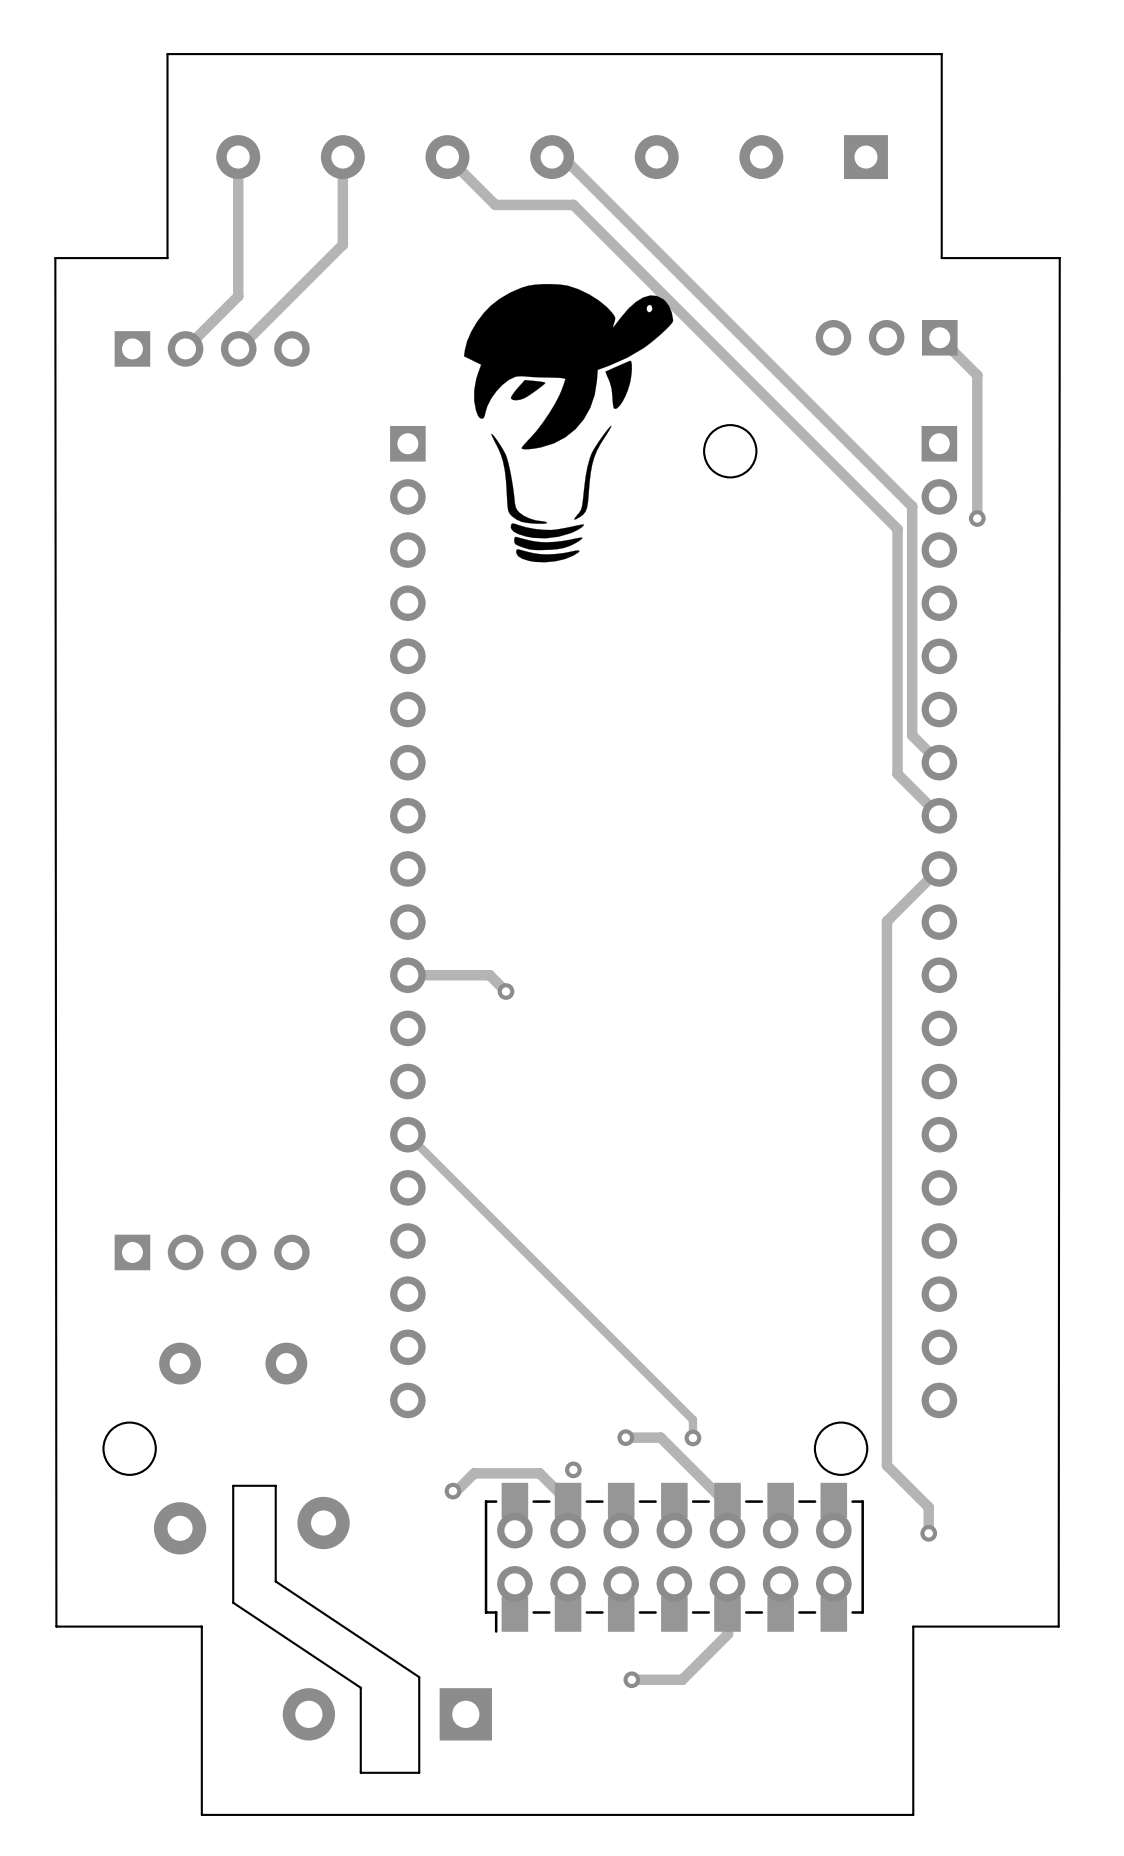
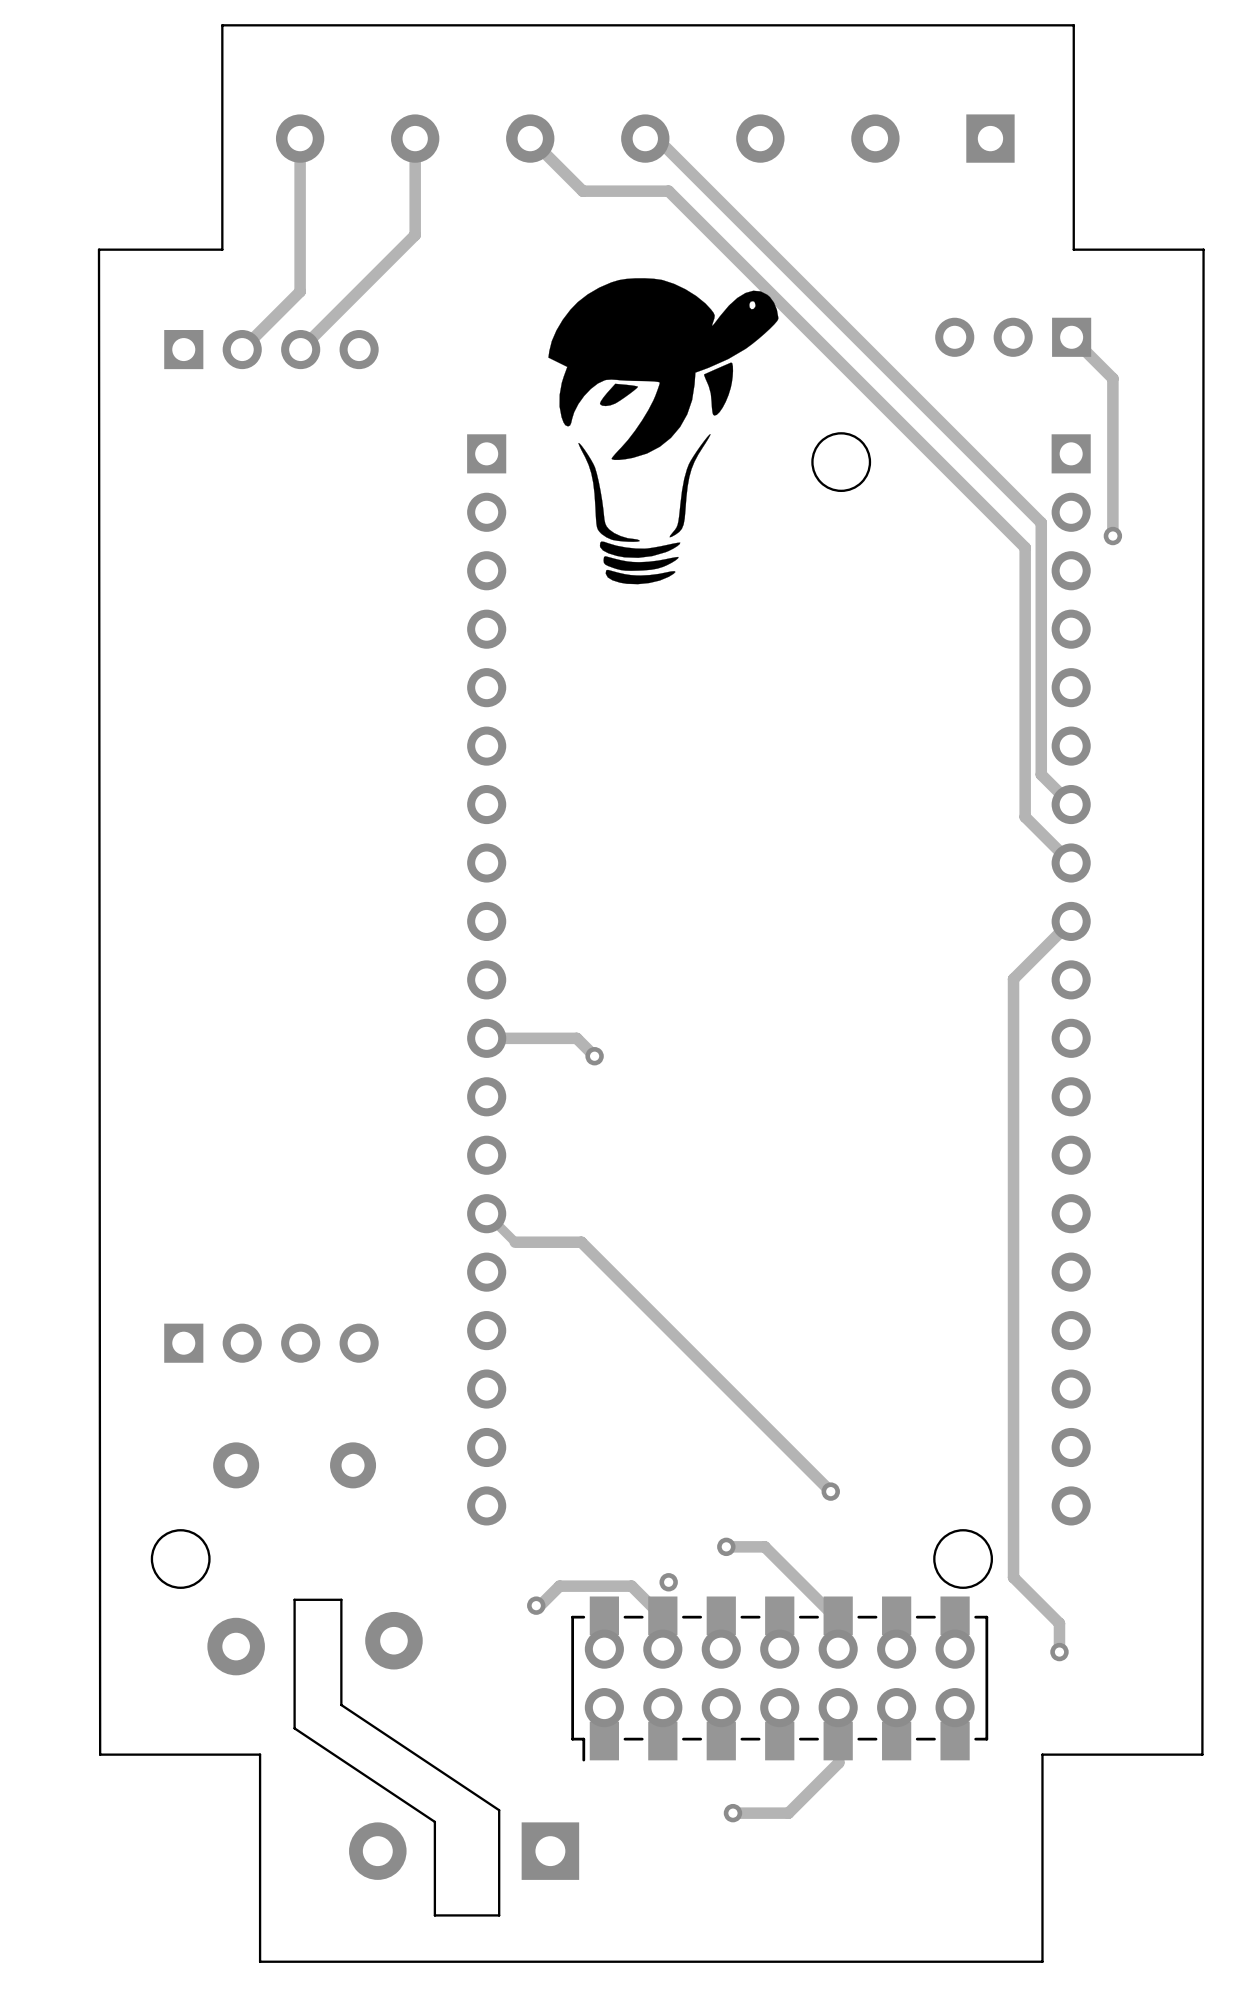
track: (433, 1160) (692, 1419) (692, 1437) -> (515, 1242) (581, 1242) (830, 1491)
via position: (692, 1437) -> (830, 1491)

